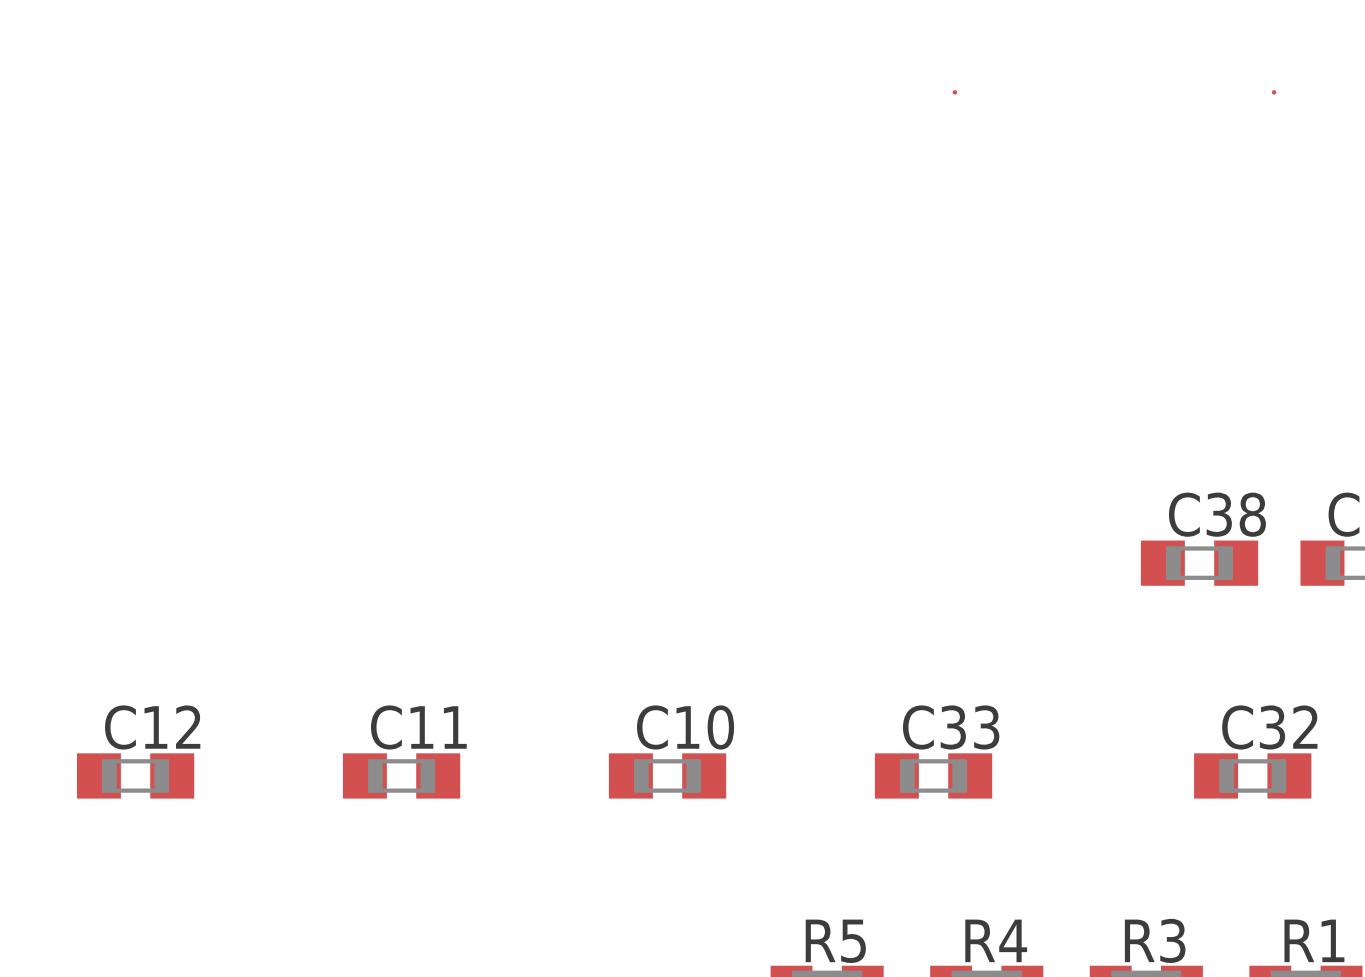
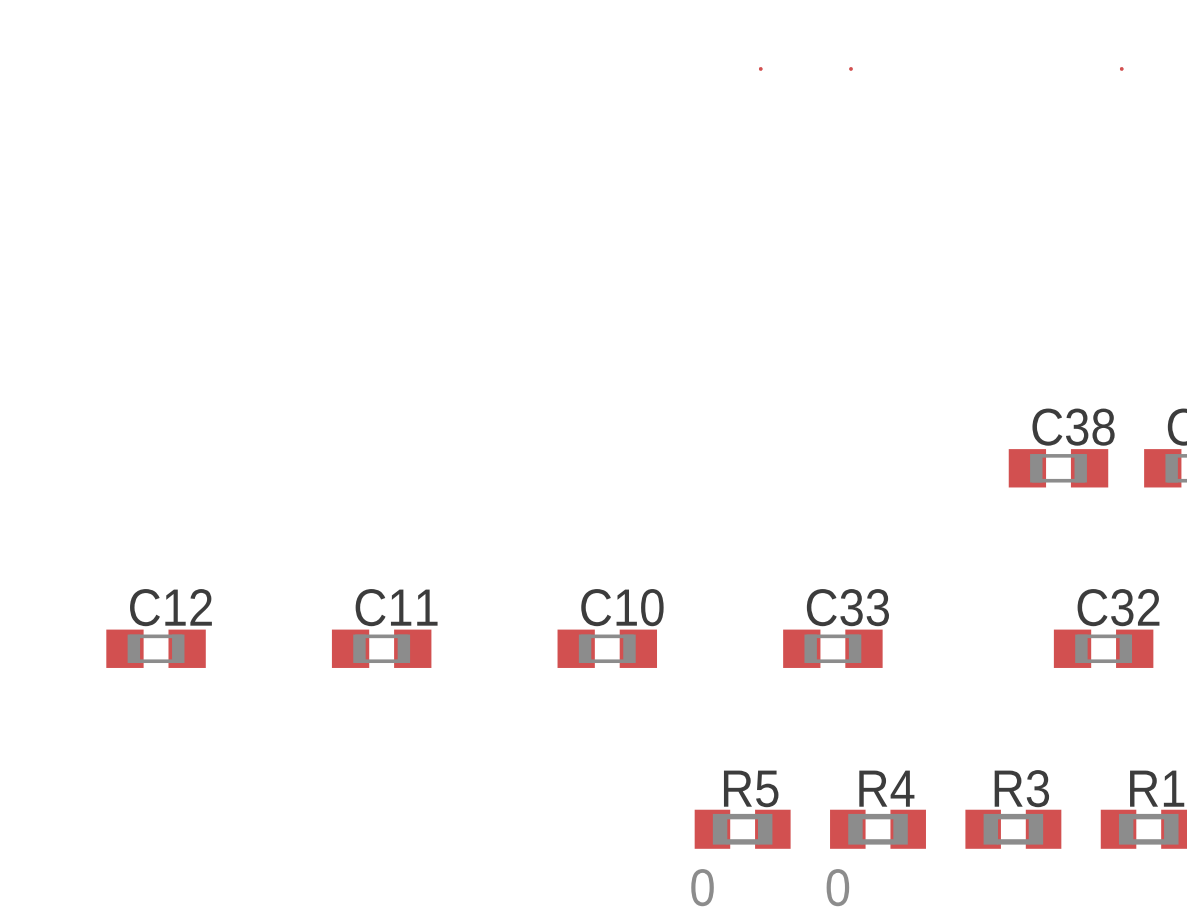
part: none -> (760, 68)

